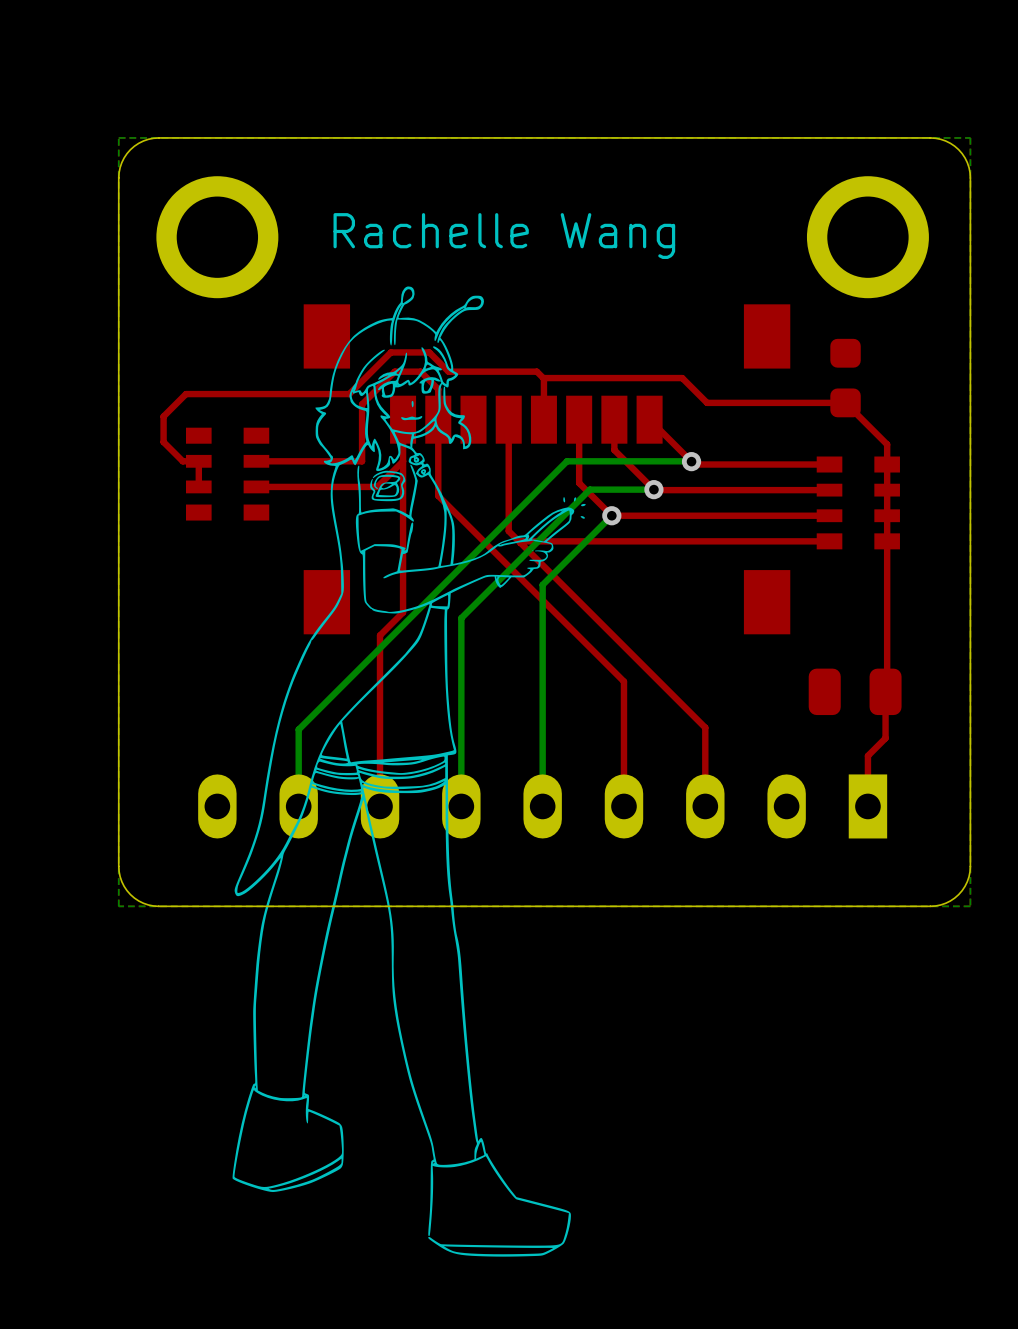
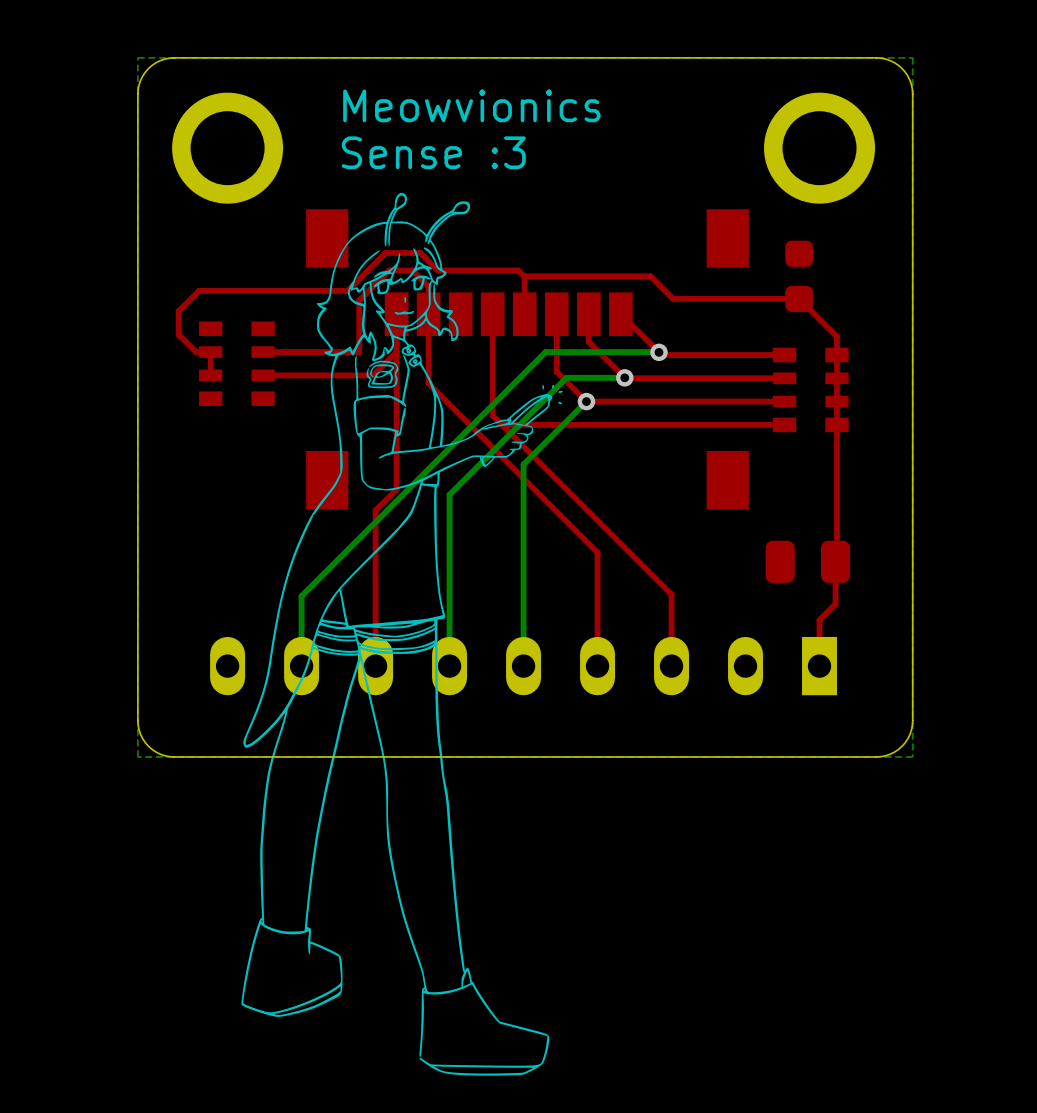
text: none -> Meowvionics (471, 105)
text: Rachelle Wang (504, 236) -> Sense :3 (433, 152)

